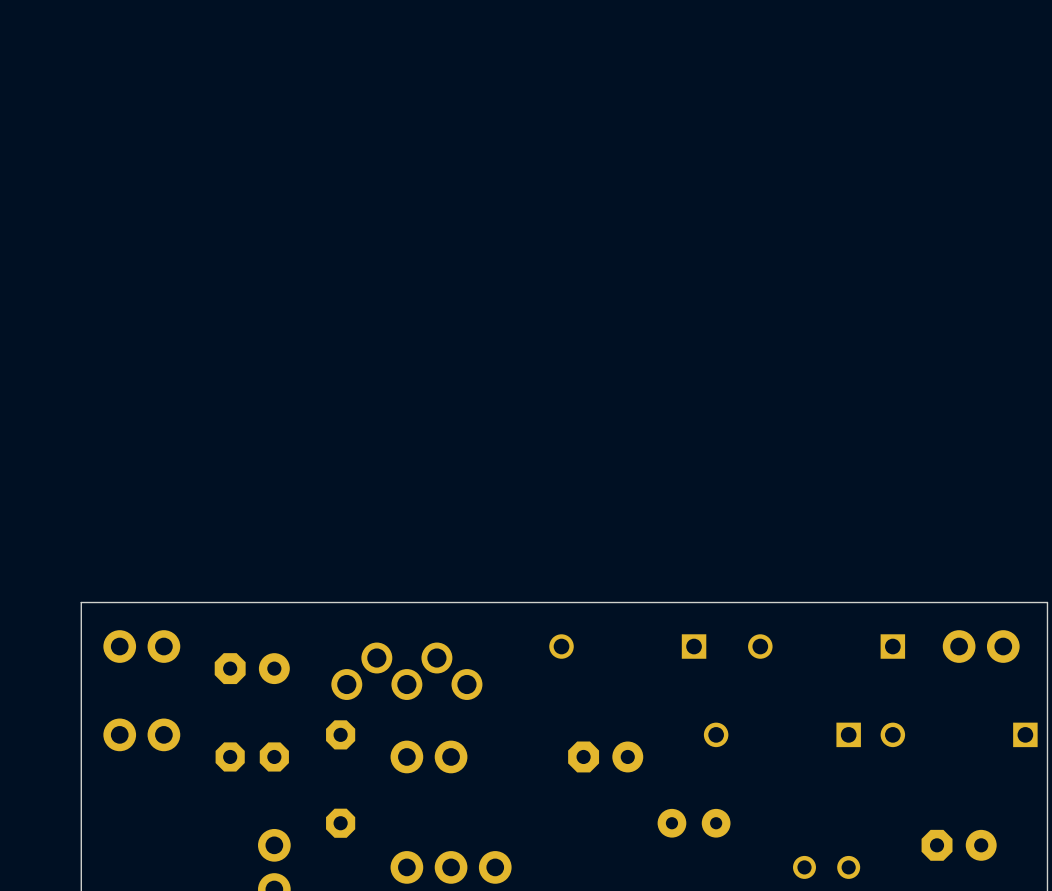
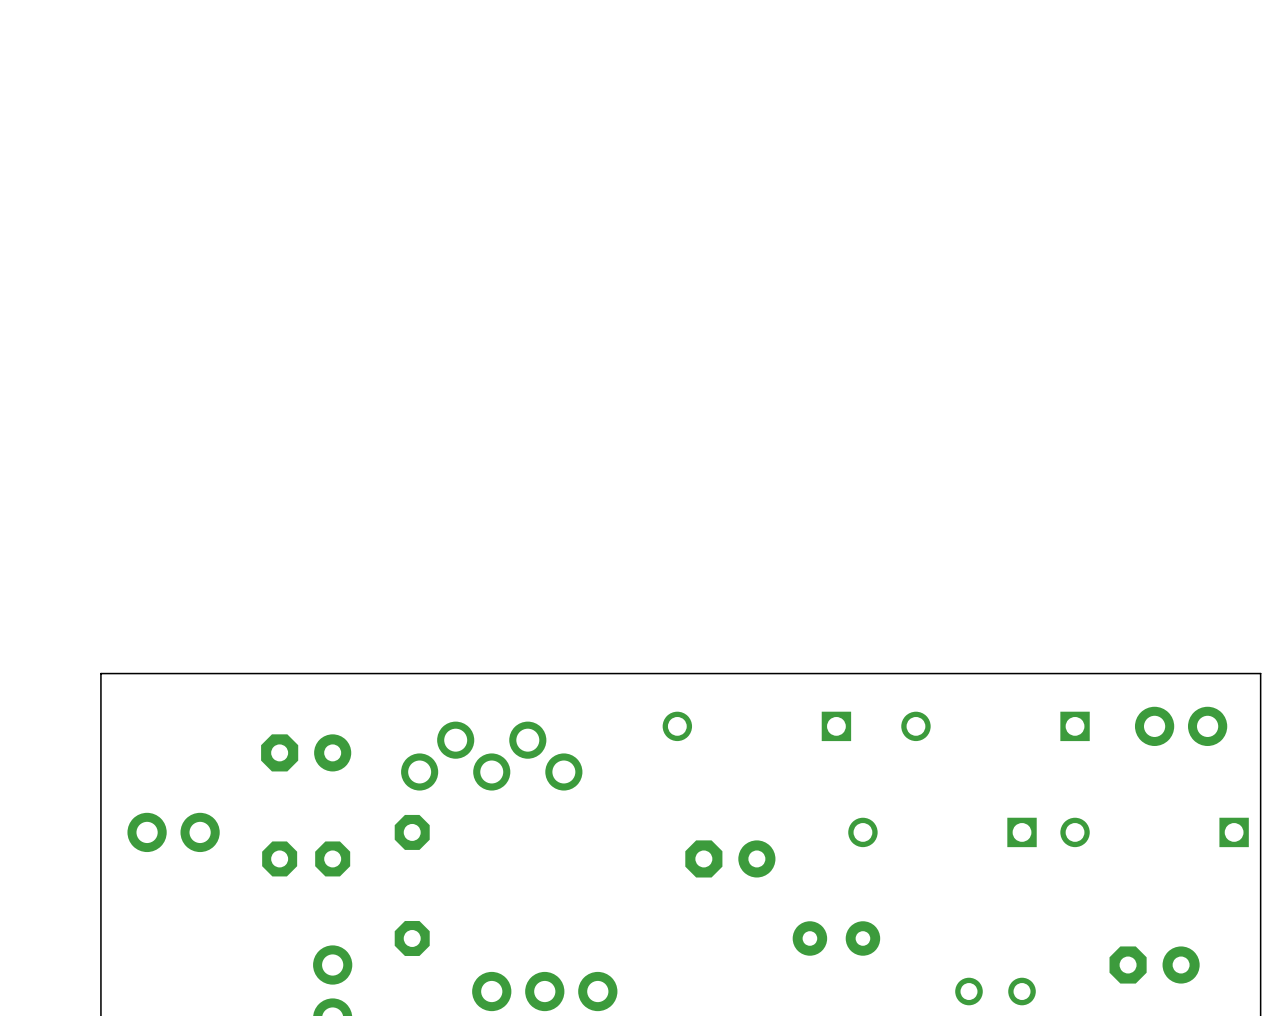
part: (141, 646) -> none
part: (428, 756) -> none

